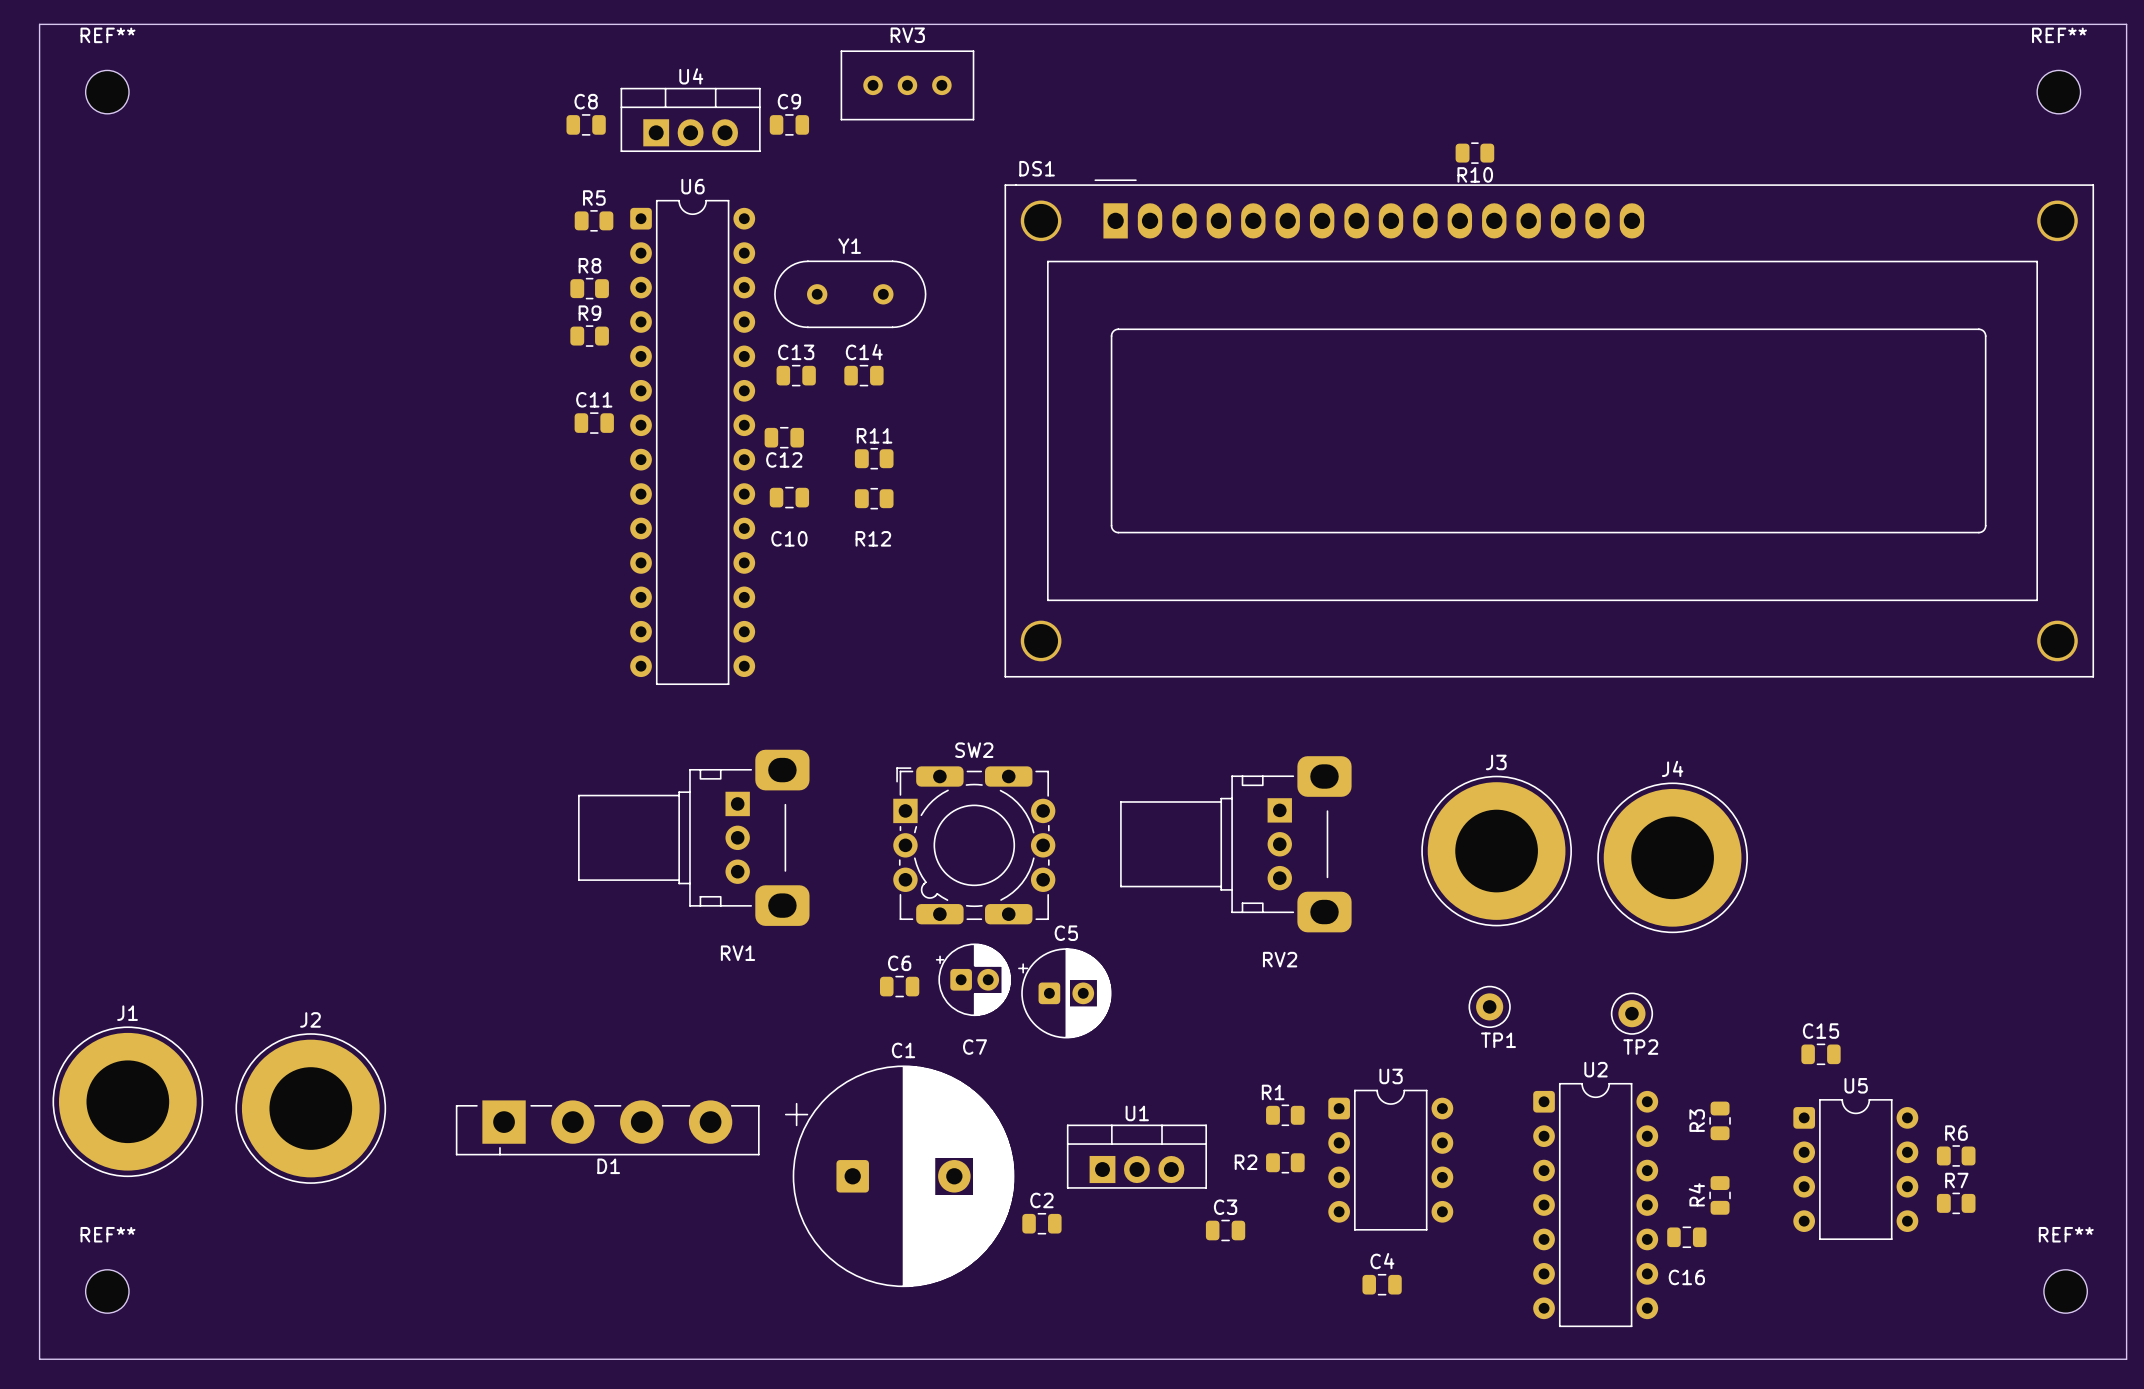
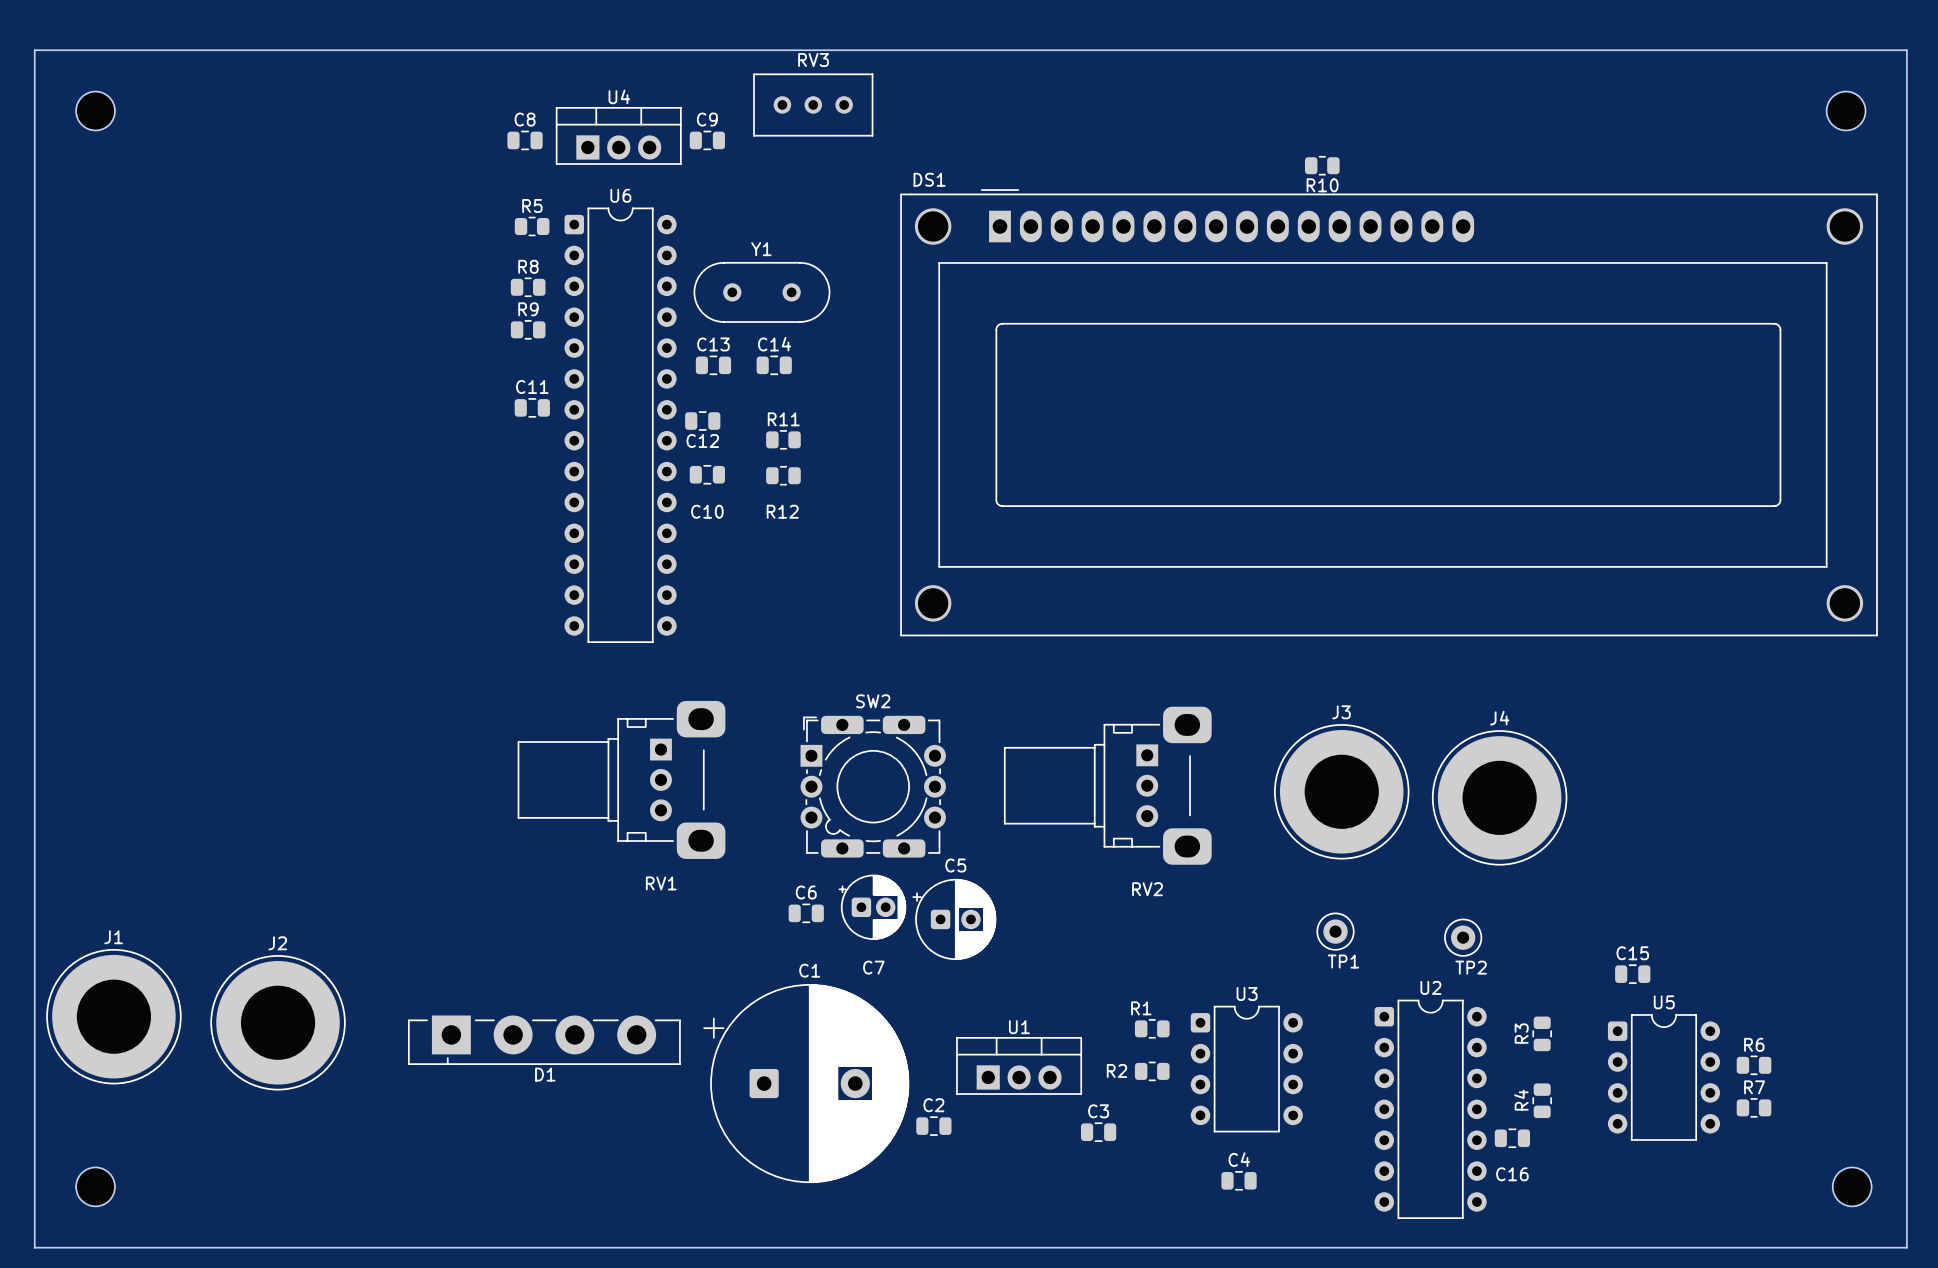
REF** name: REF** (107, 35) -> none
REF** name: REF** (2059, 35) -> none
REF** name: REF** (107, 1234) -> none
REF** name: REF** (2066, 1234) -> none

